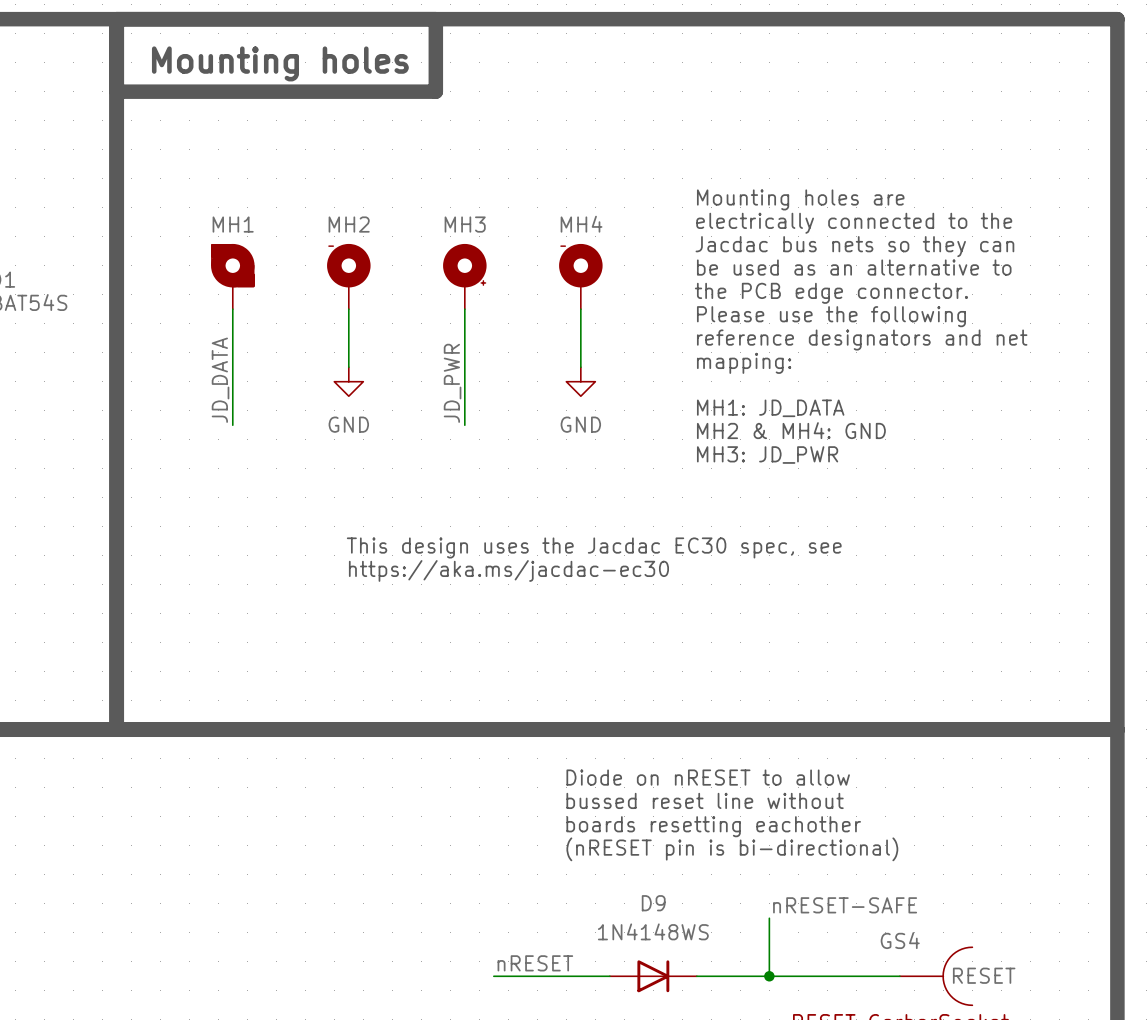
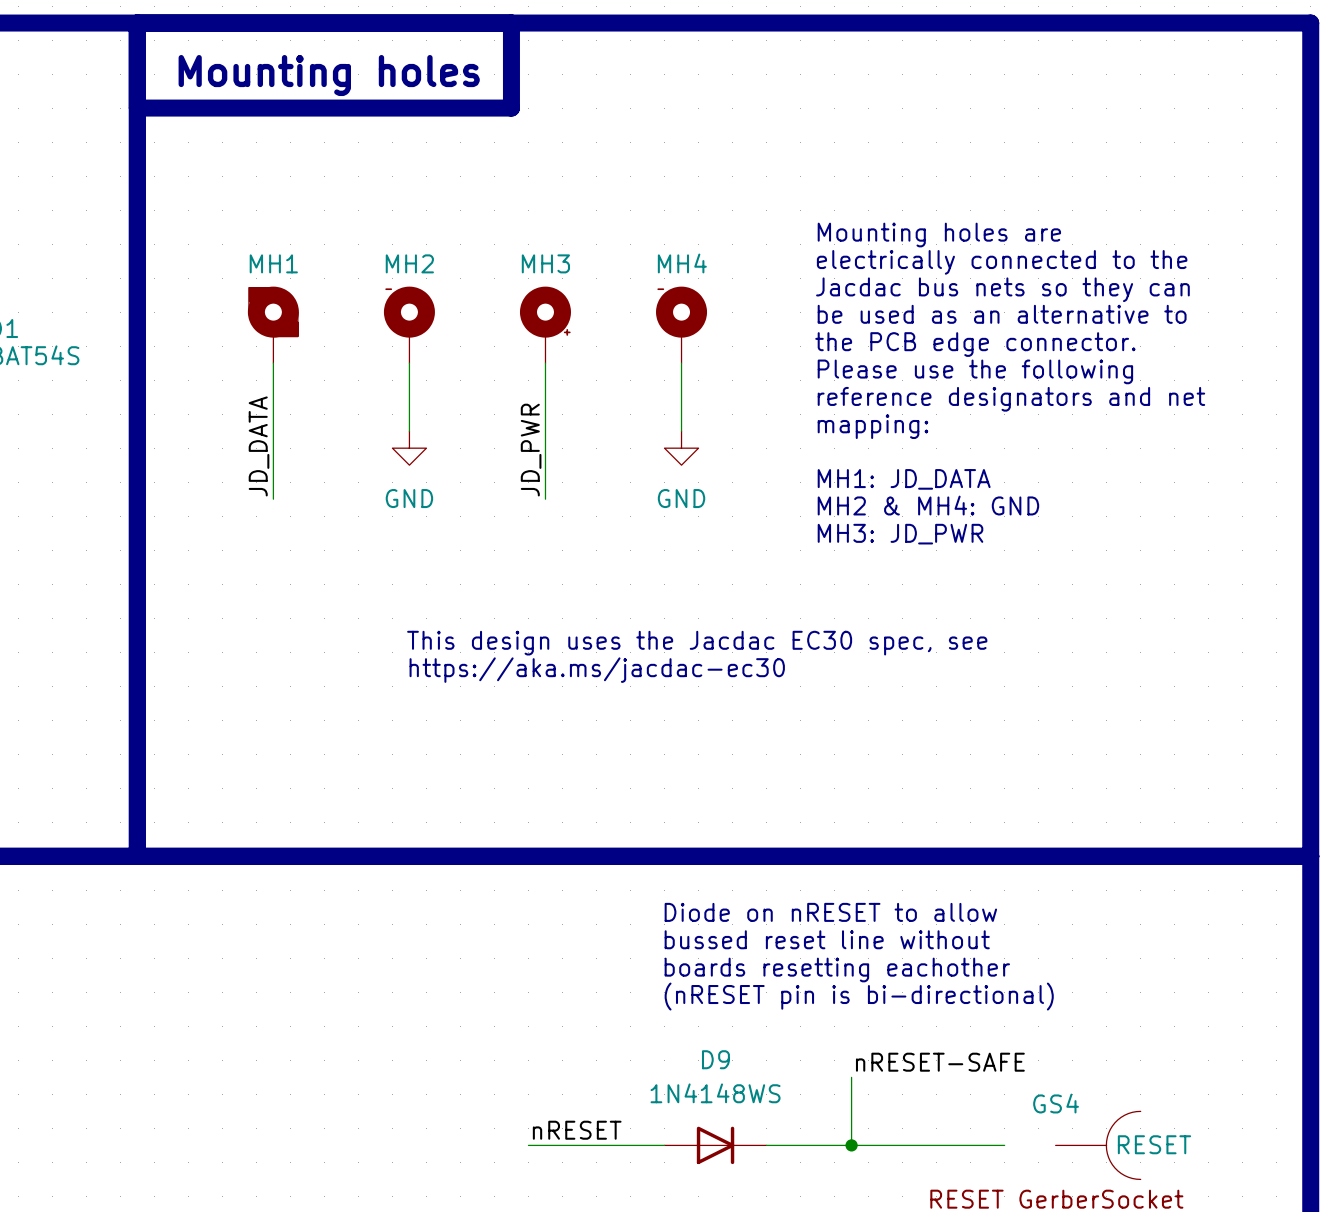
label position: nRESET-SAFE (845, 905) -> nRESET-SAFE (940, 1062)
wire: (769, 918) (769, 976) -> (851, 1077) (851, 1145)
label position: nRESET (535, 963) -> nRESET (577, 1130)
wire: none -> (528, 1145) (579, 1145)
D9 position: (653, 976) -> (715, 1145)
junction position: (769, 976) -> (851, 1145)
wire: (856, 976) (899, 976) -> none

